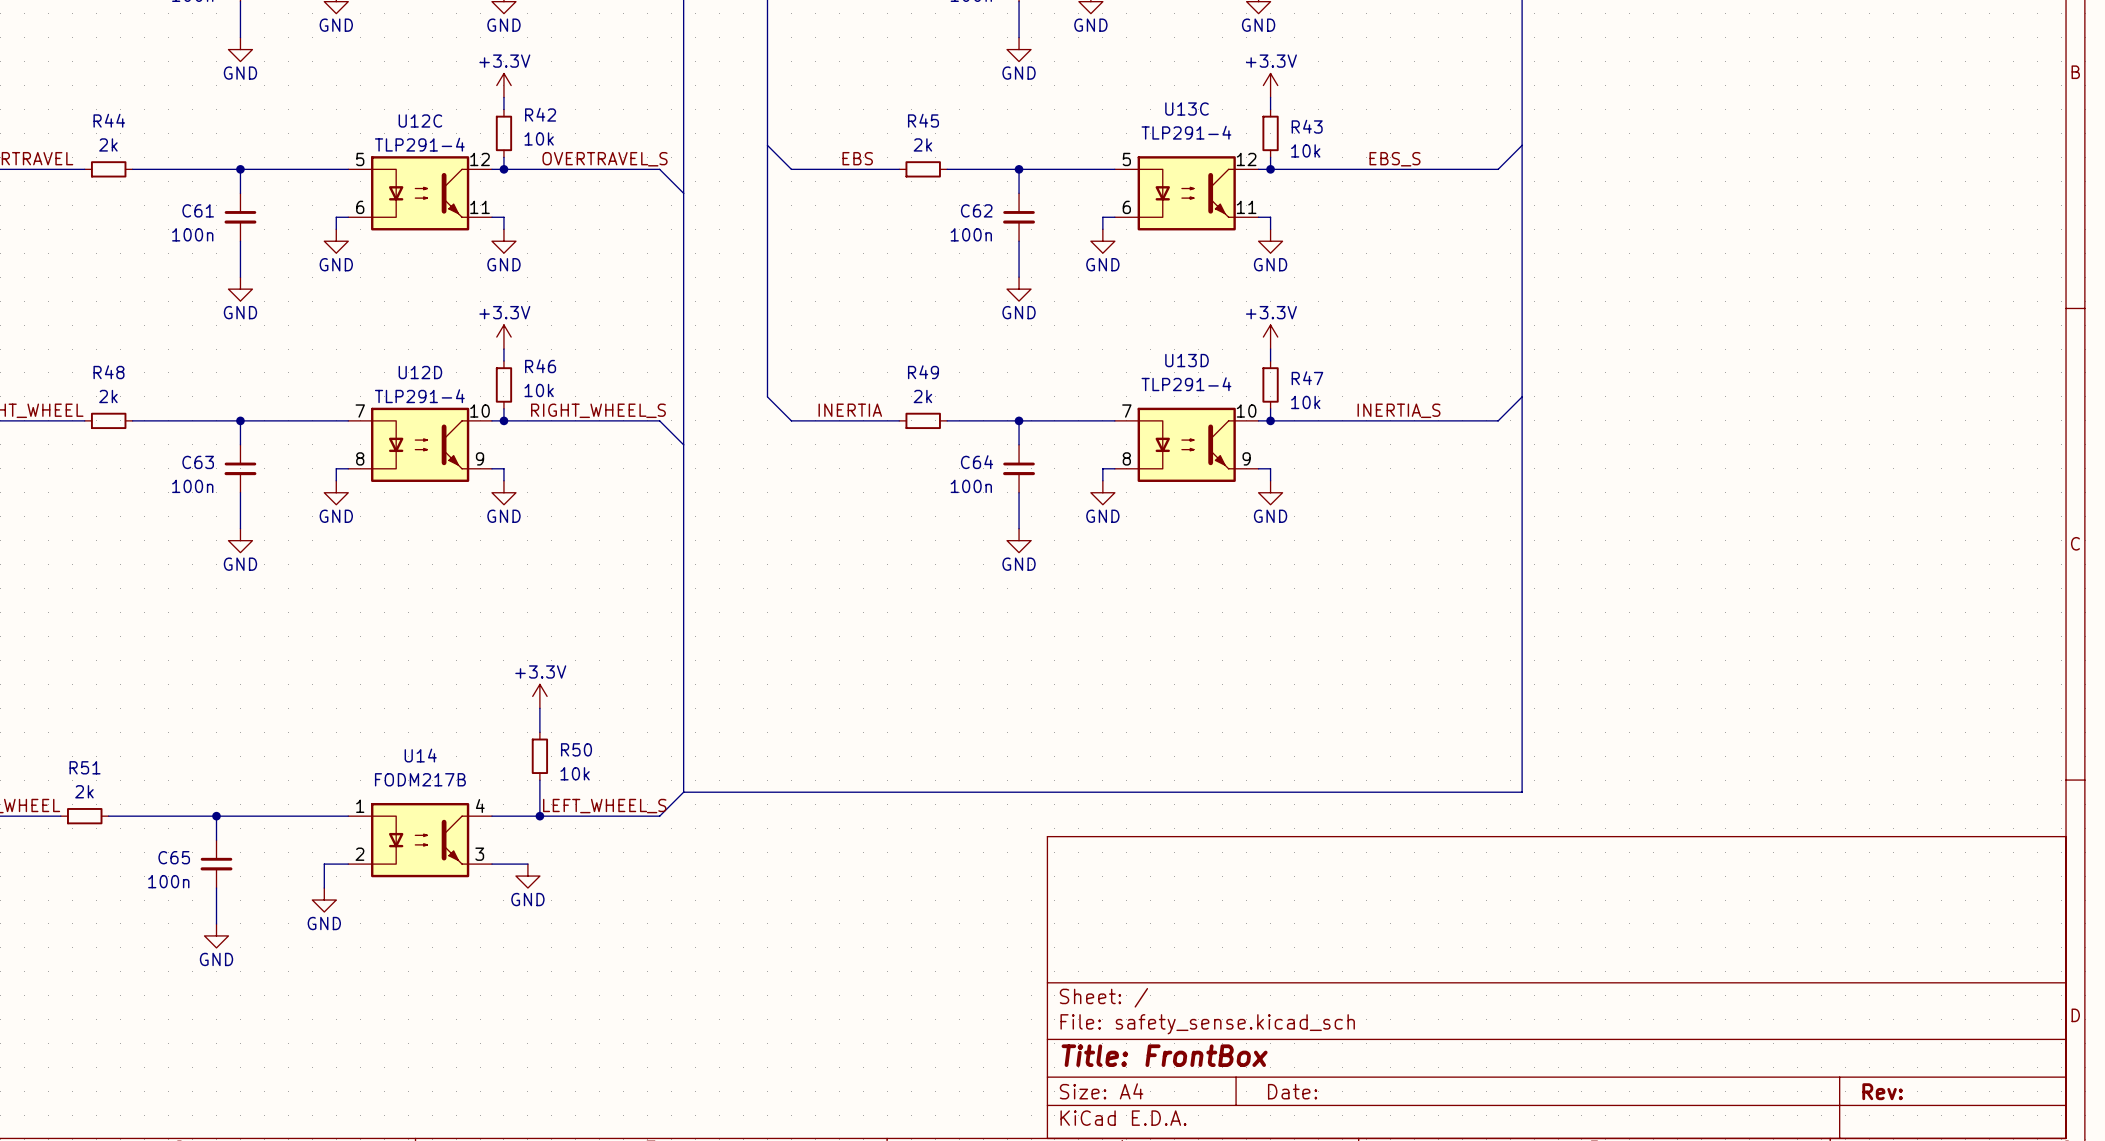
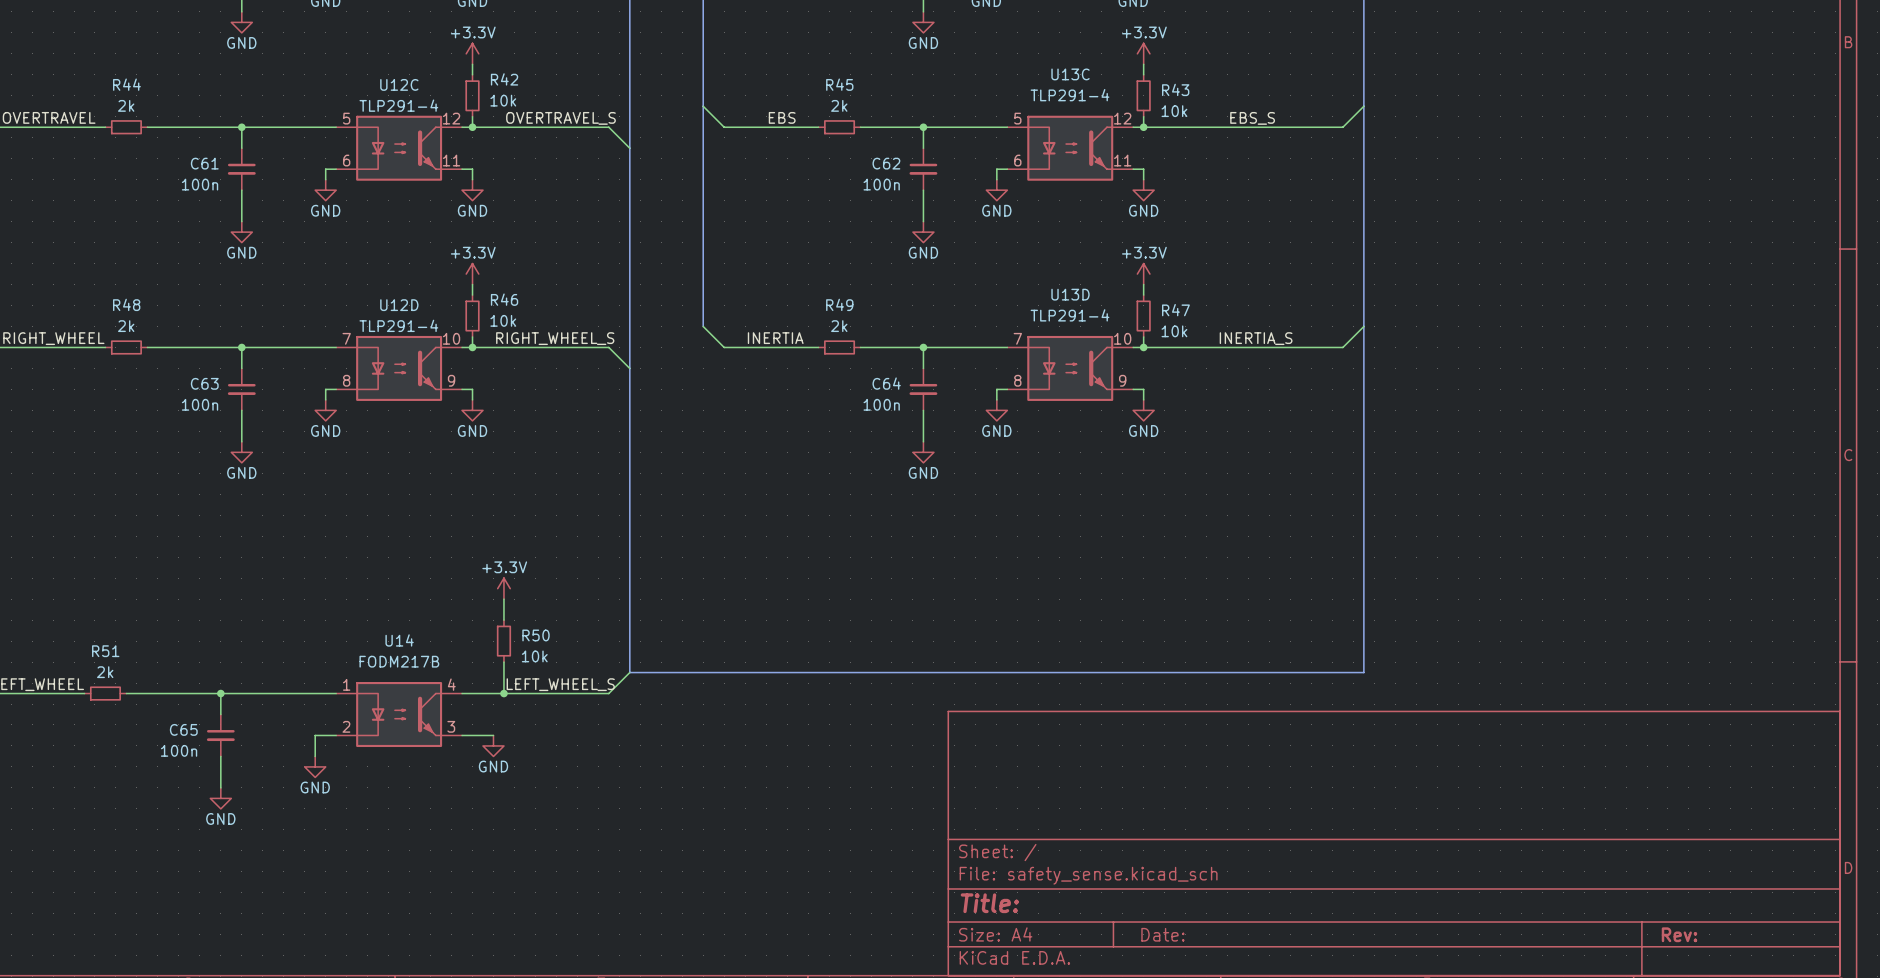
title block: Title: FrontBox (1164, 1055) -> Title: (989, 903)

